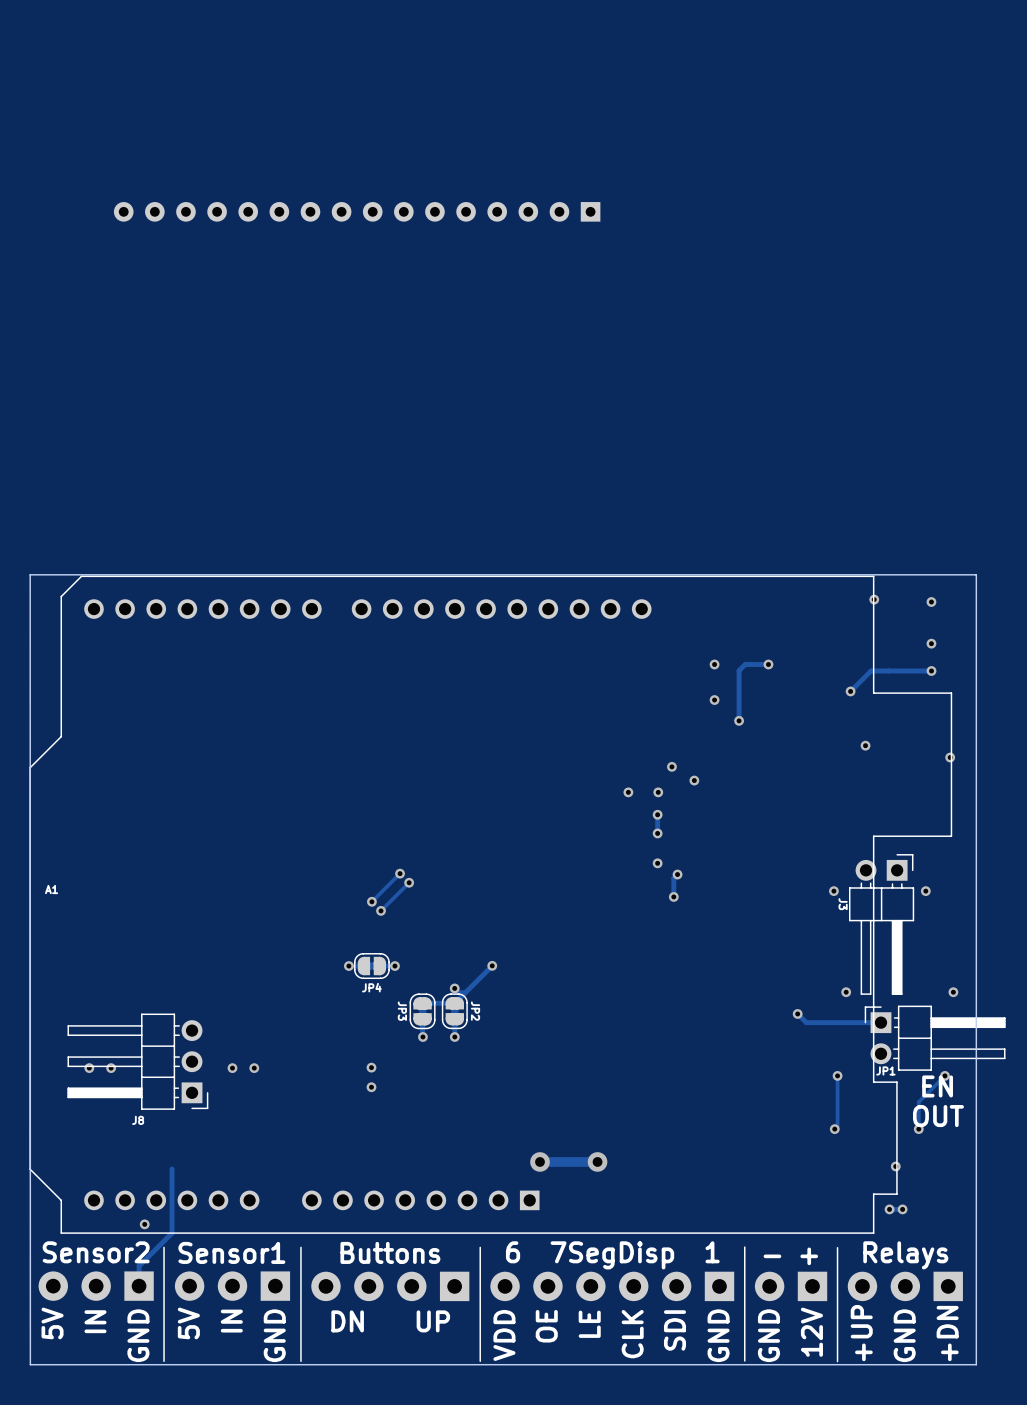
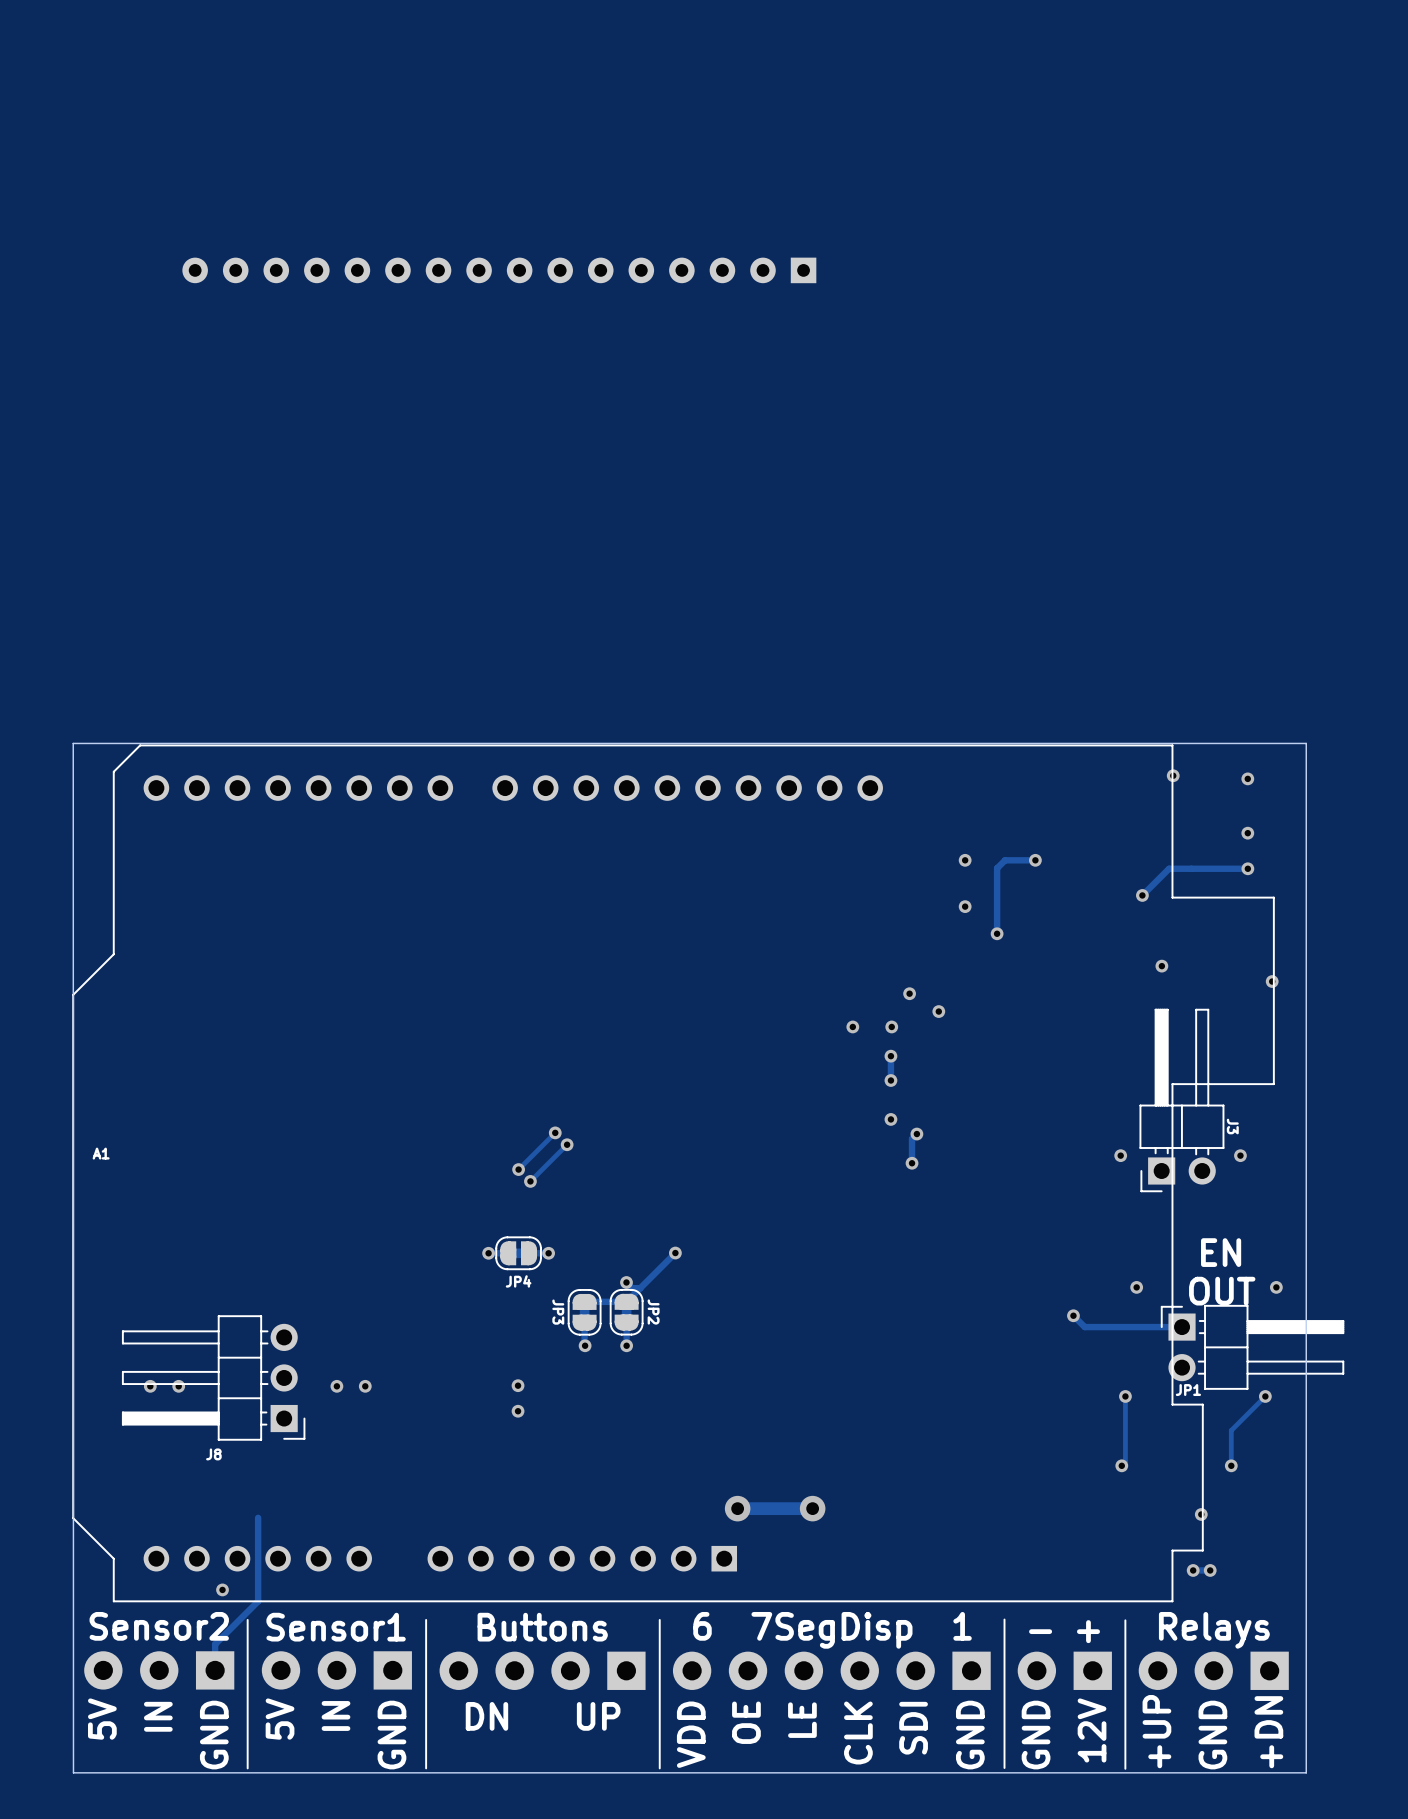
J3 rotation: 0° (881, 924) -> 180° (1181, 1100)
text position: EN (937, 1086) -> EN (1221, 1252)
text position: OUT (938, 1116) -> OUT (1222, 1291)

